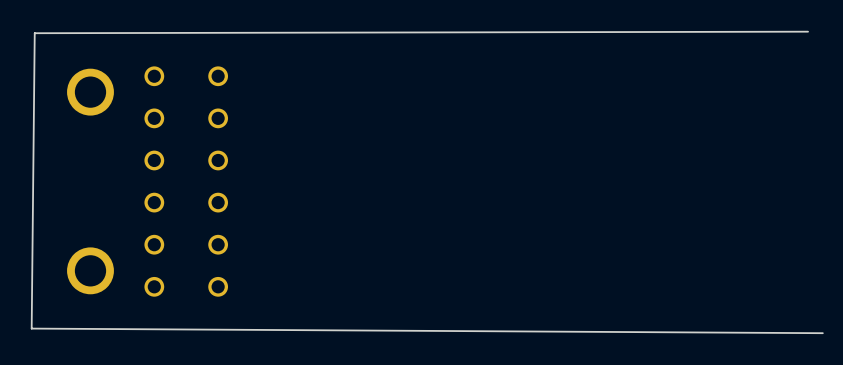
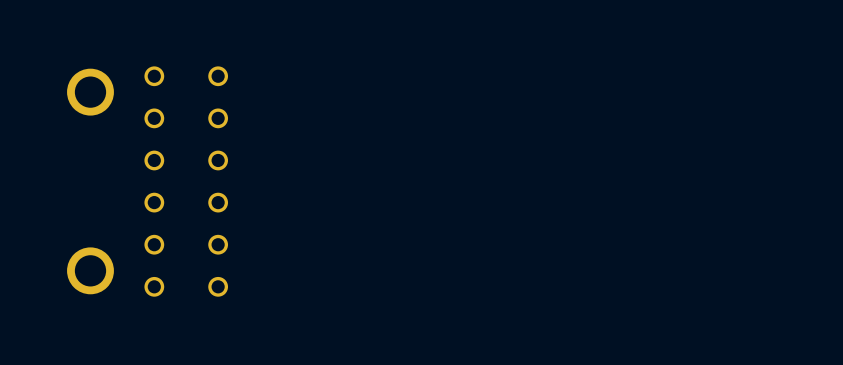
board edge: (808, 31) (34, 33) (31, 328) (822, 333) -> none

